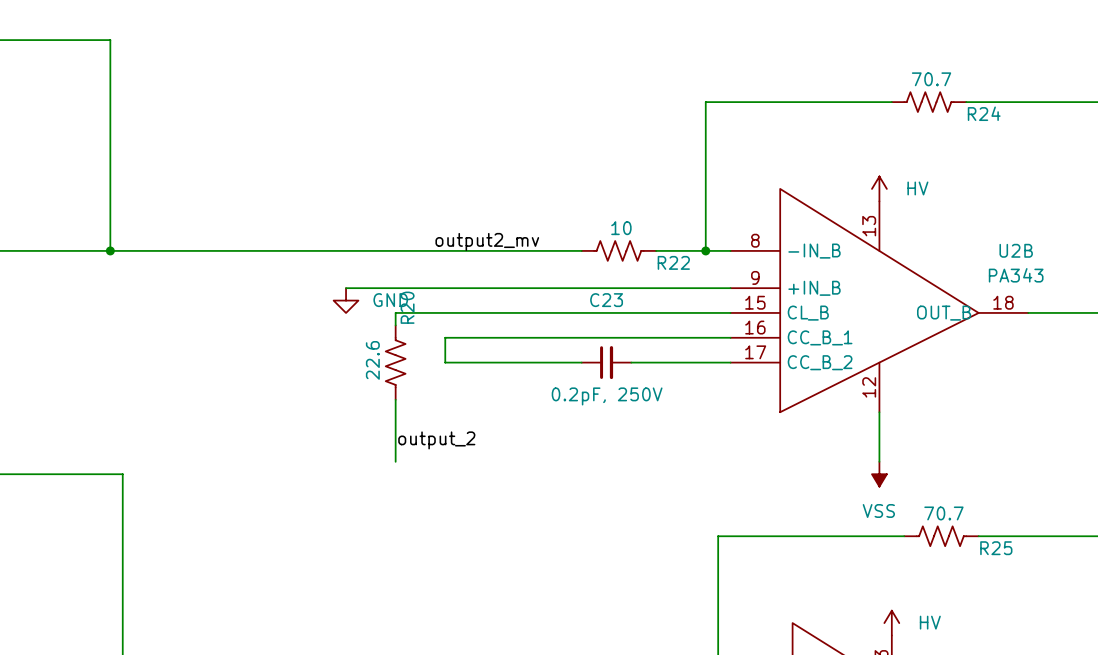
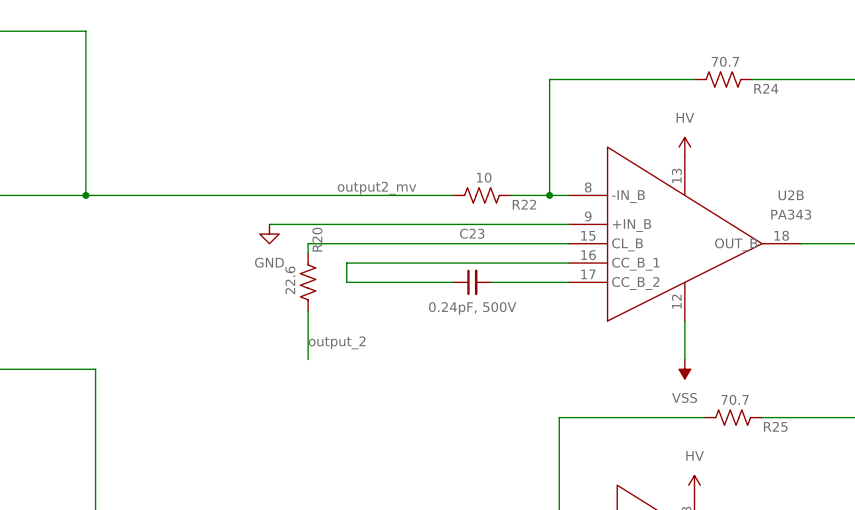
power symbol text position: HV (917, 188) -> HV (685, 117)
power symbol text position: GND (390, 300) -> GND (269, 262)
C23 value: 0.2pF, 250V (607, 396) -> 0.24pF, 500V (472, 308)
power symbol text position: HV (930, 622) -> HV (695, 455)

